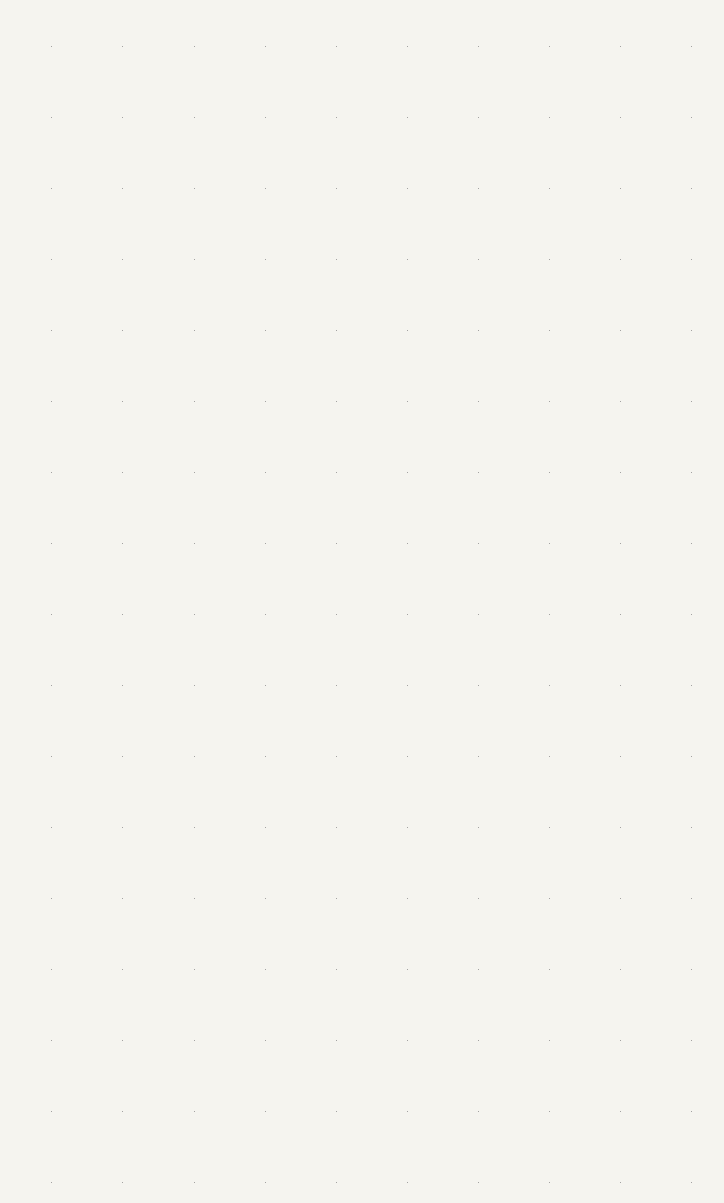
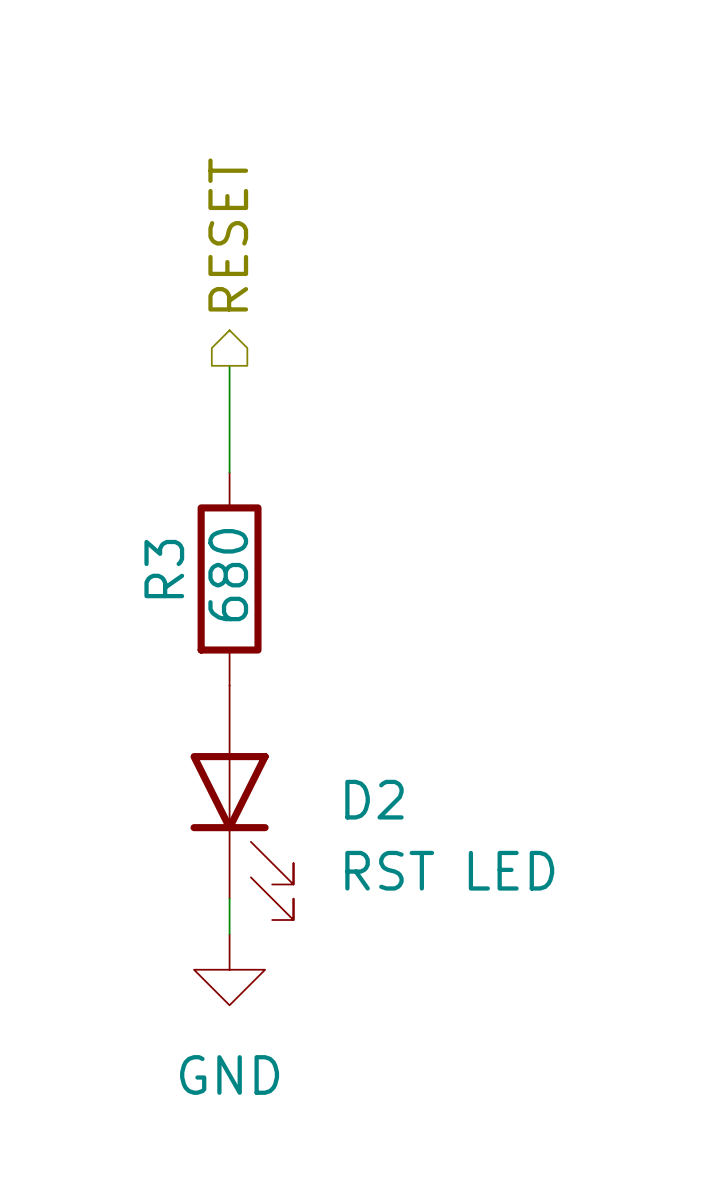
hierarchical label: none -> RESET (228, 234)
wire: none -> (229, 365) (229, 472)
R3: none -> 680 (229, 578)
D2: none -> RST LED (242, 802)
wire: none -> (229, 898) (229, 934)
power symbol: none -> GND (229, 969)

